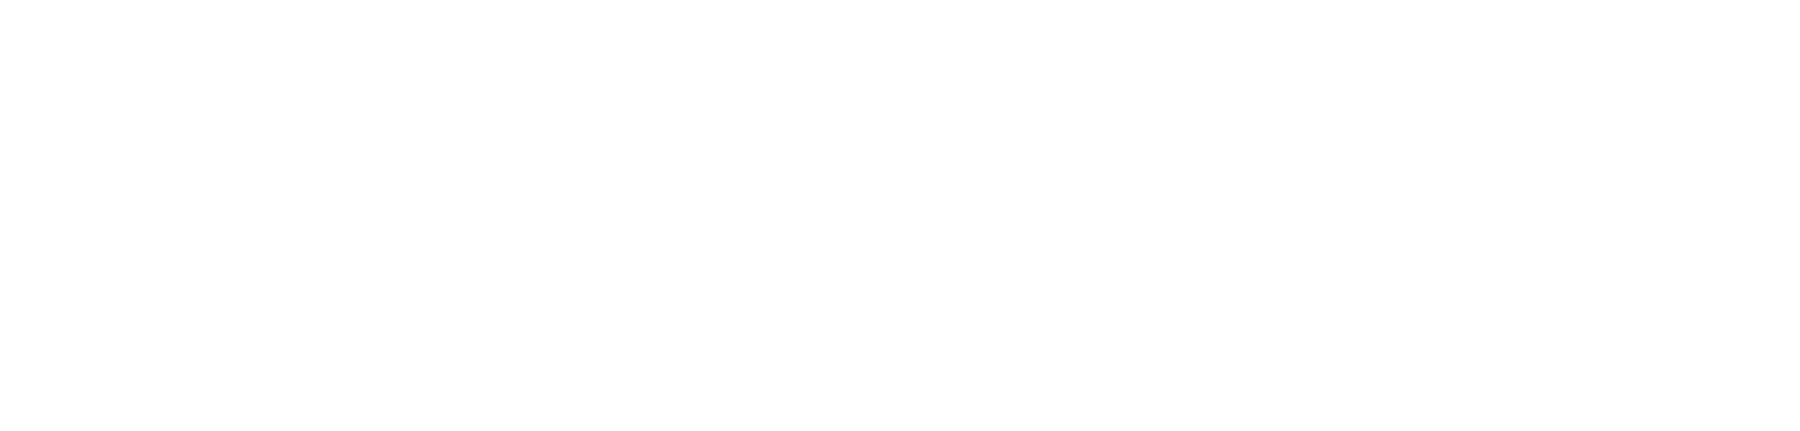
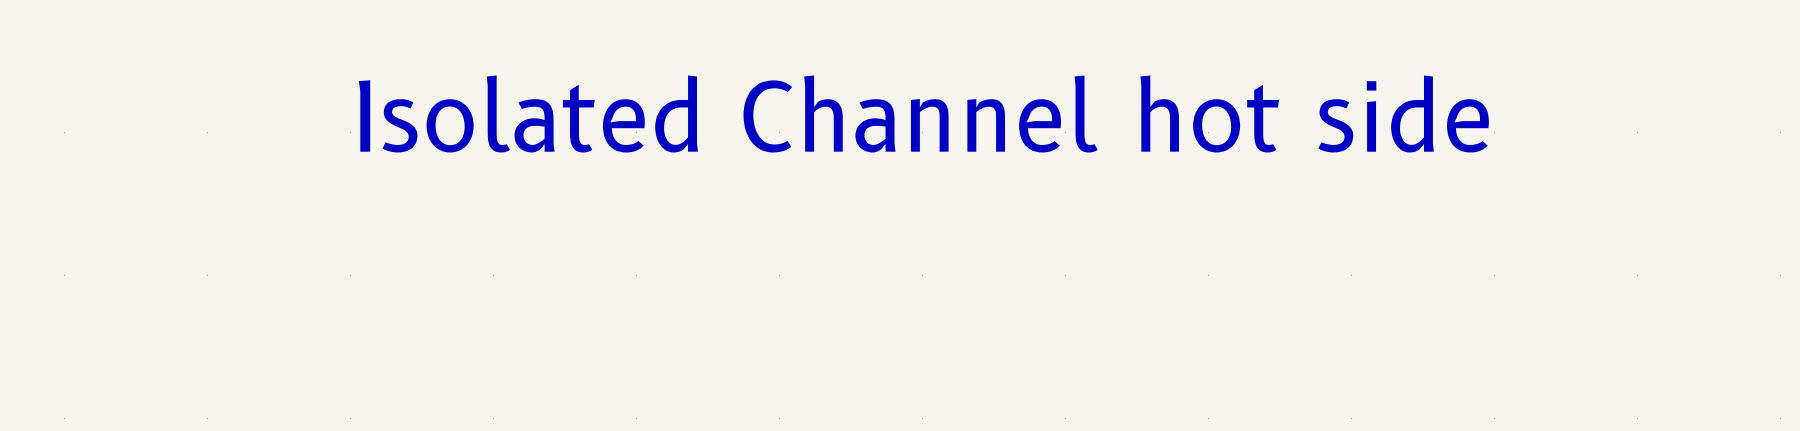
text: none -> Isolated Channel hot side (923, 114)

